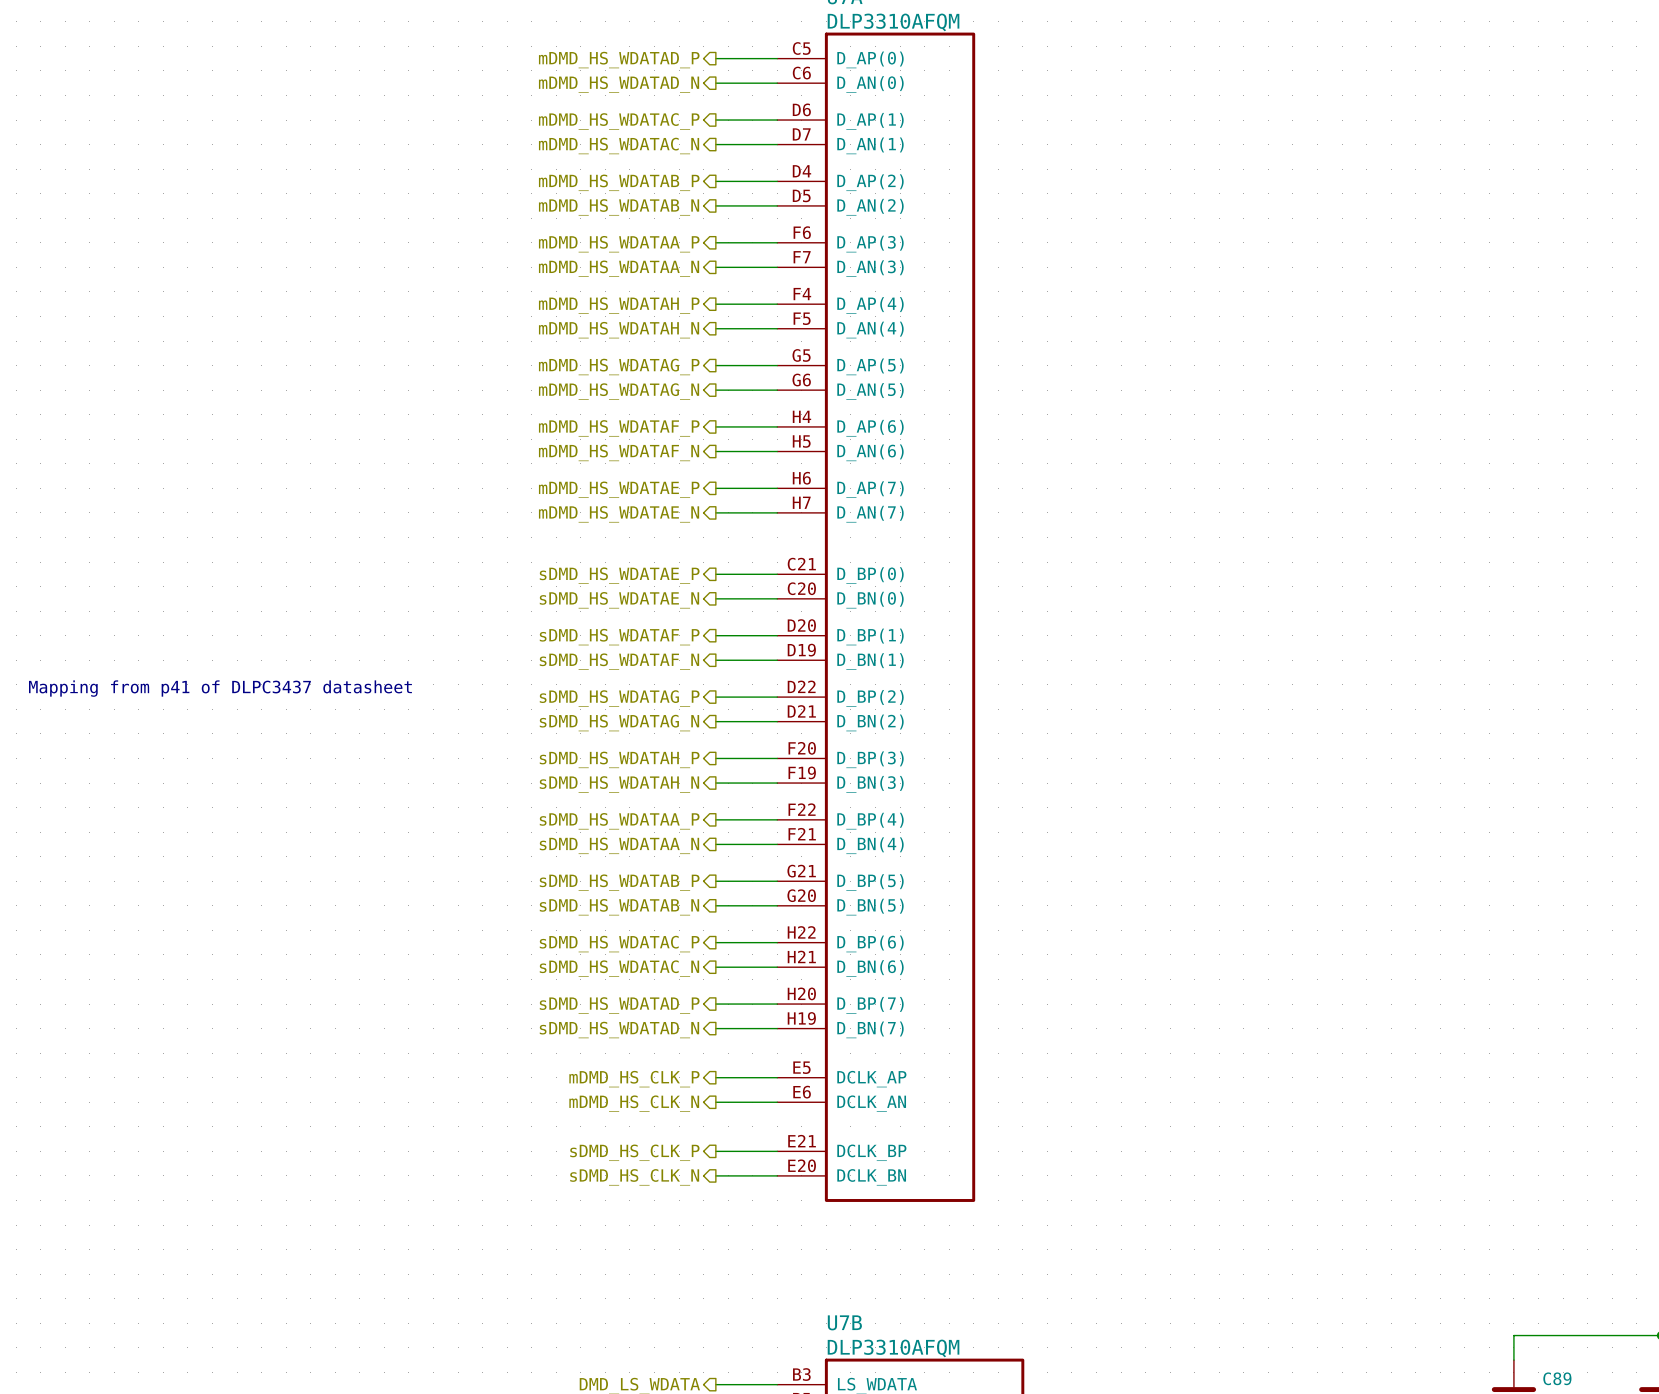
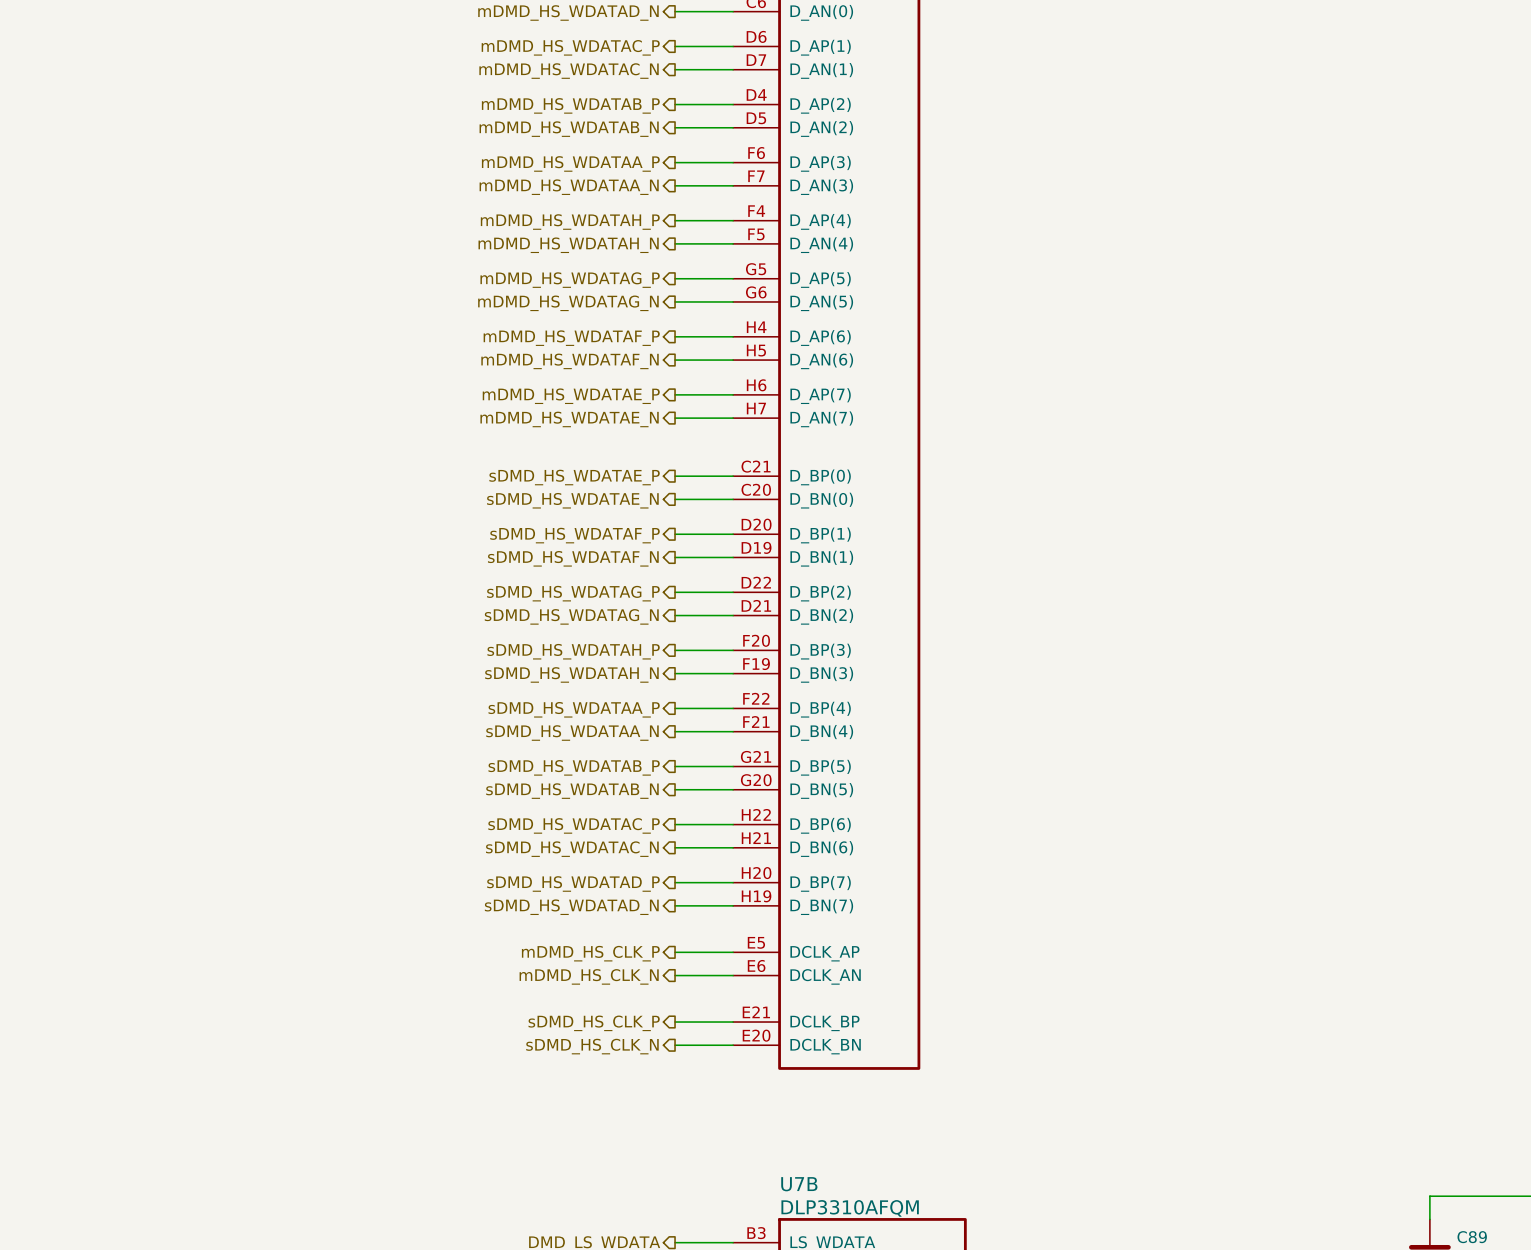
text: Mapping from p41 of DLPC3437 datasheet (220, 688) -> none

